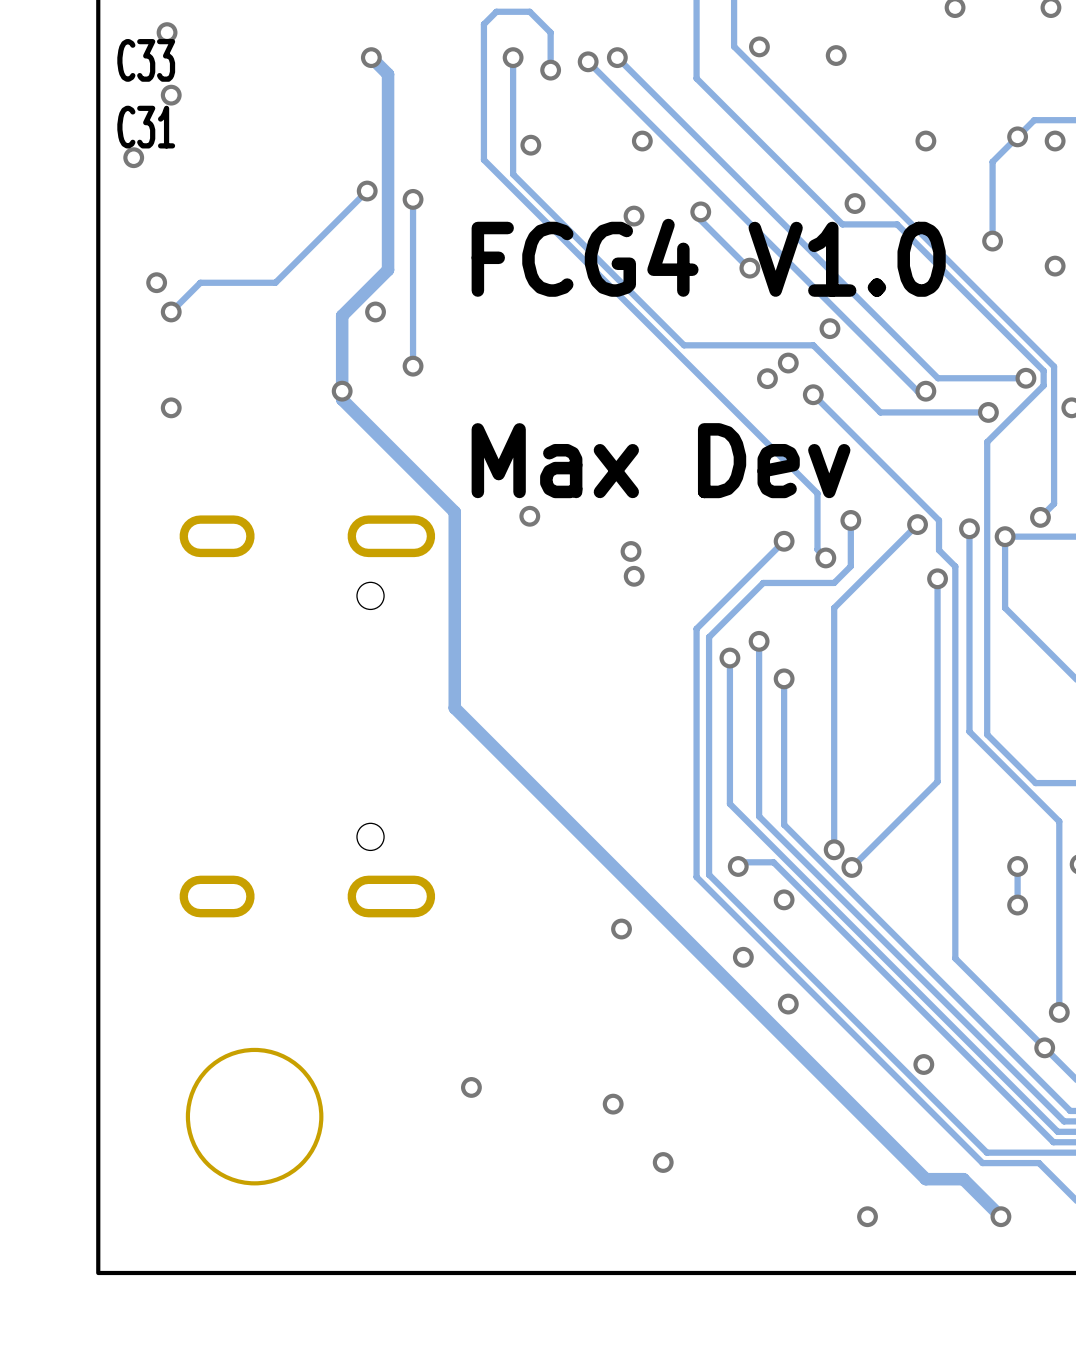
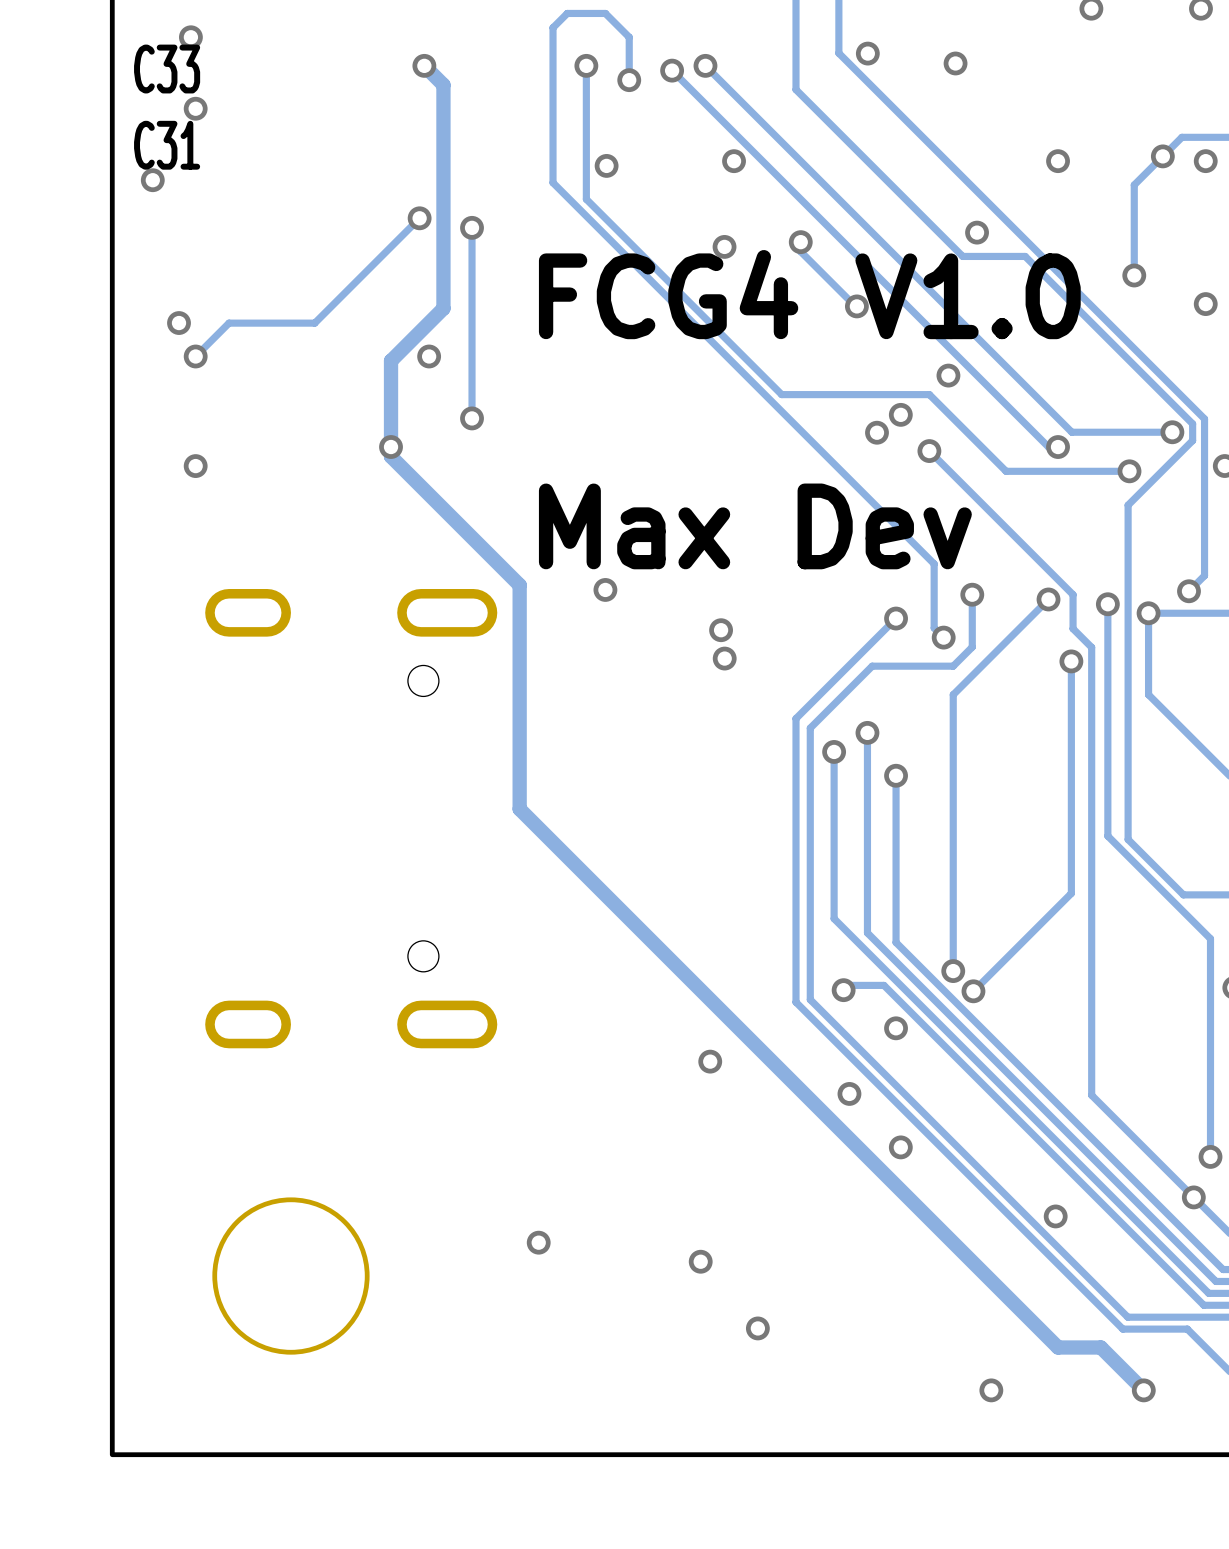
track: (1017, 866) (1017, 905) -> none
via: (1017, 866) -> none
via: (1017, 905) -> none

